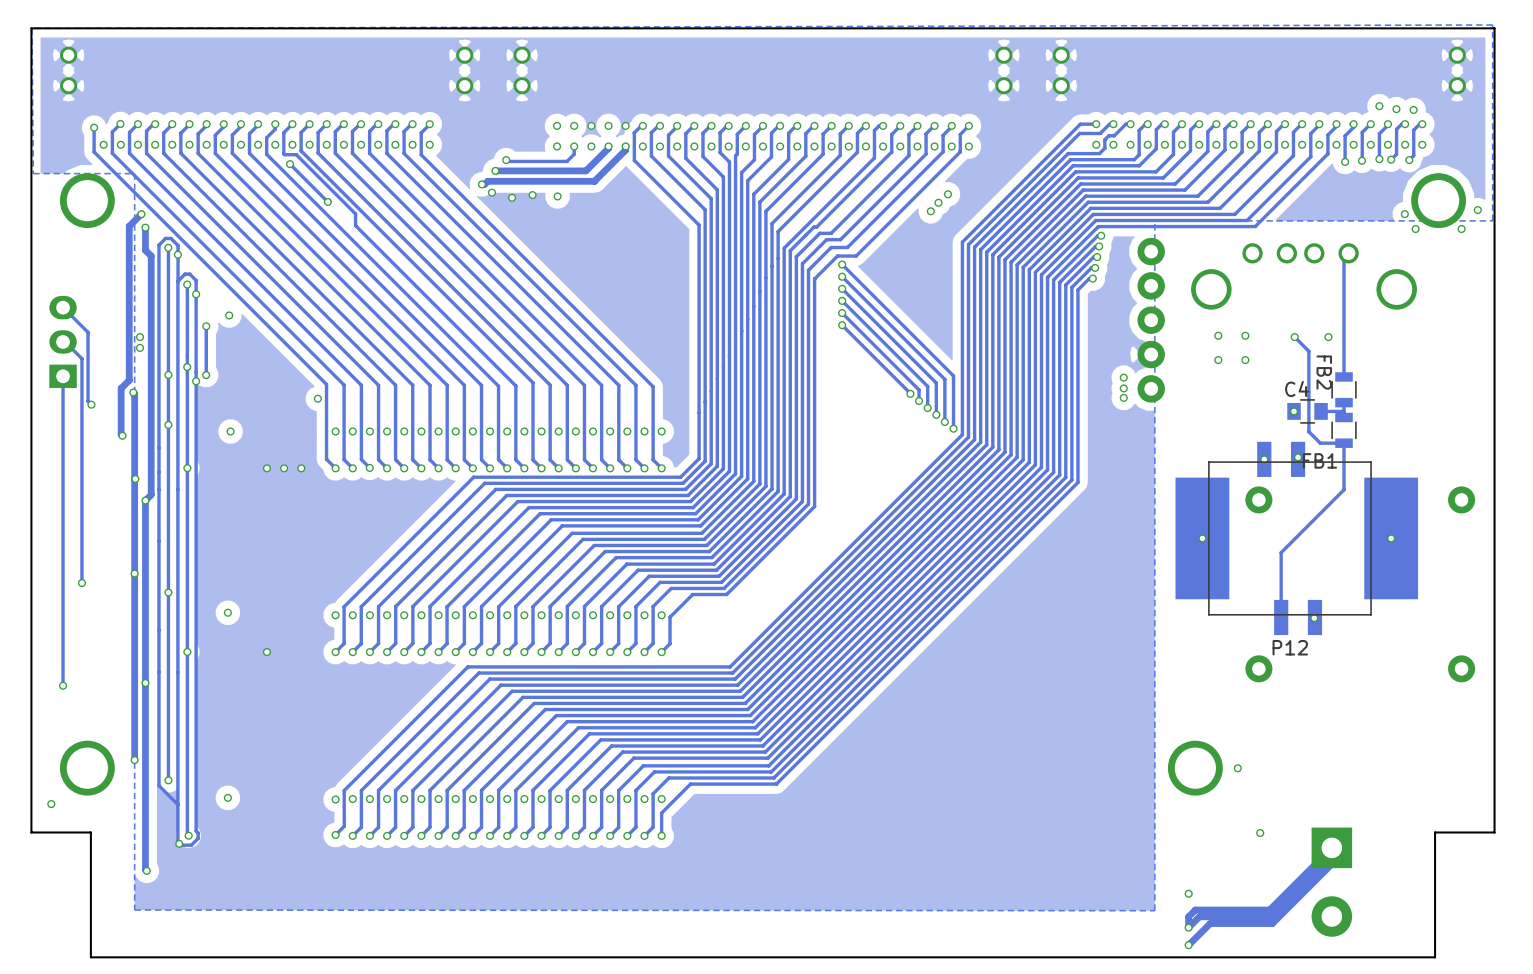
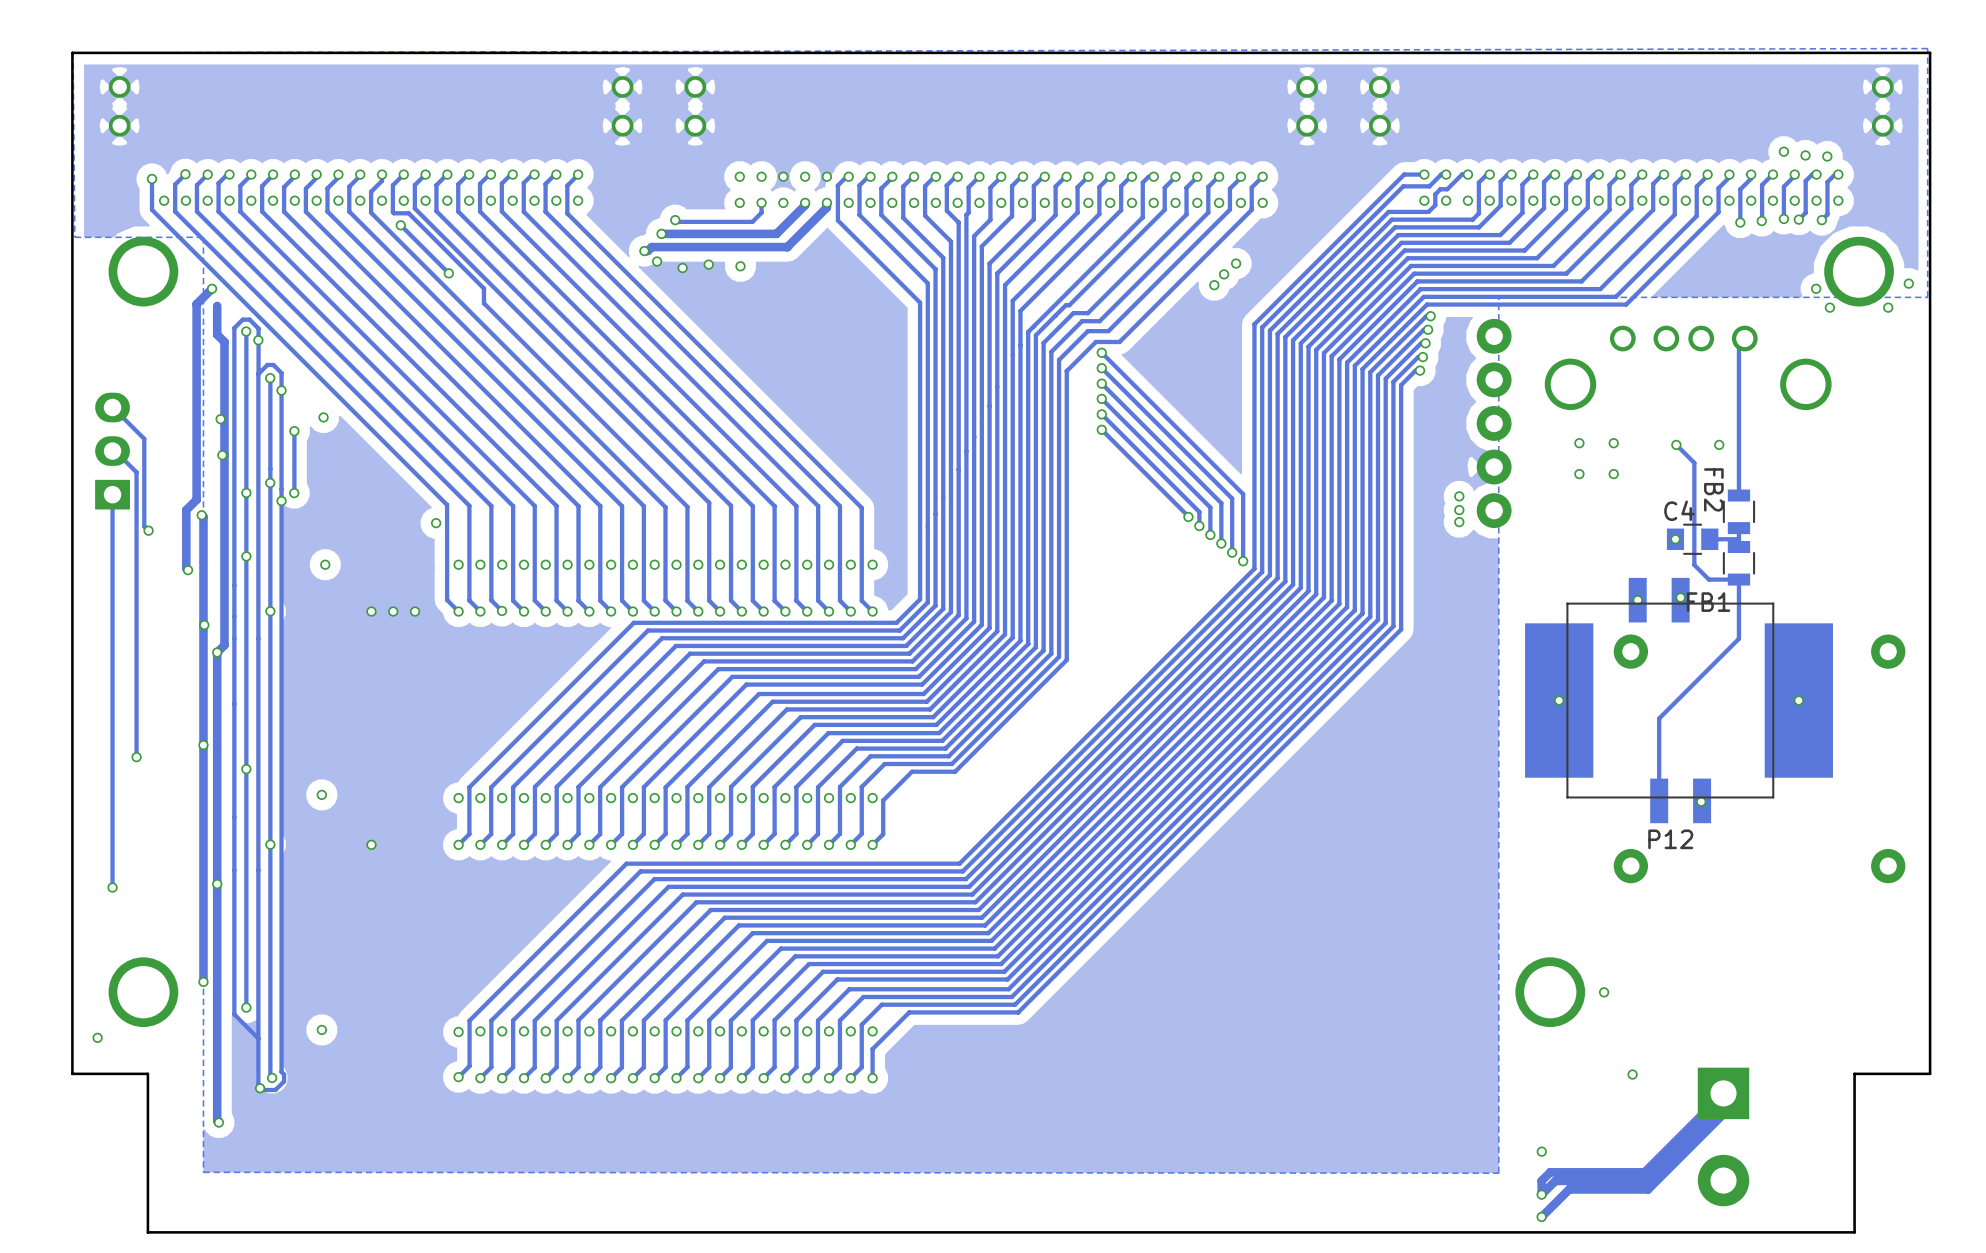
via: (145, 227) -> none
via: none -> (220, 419)
via: (140, 337) -> none
via: none -> (222, 455)
via: (140, 347) -> none

